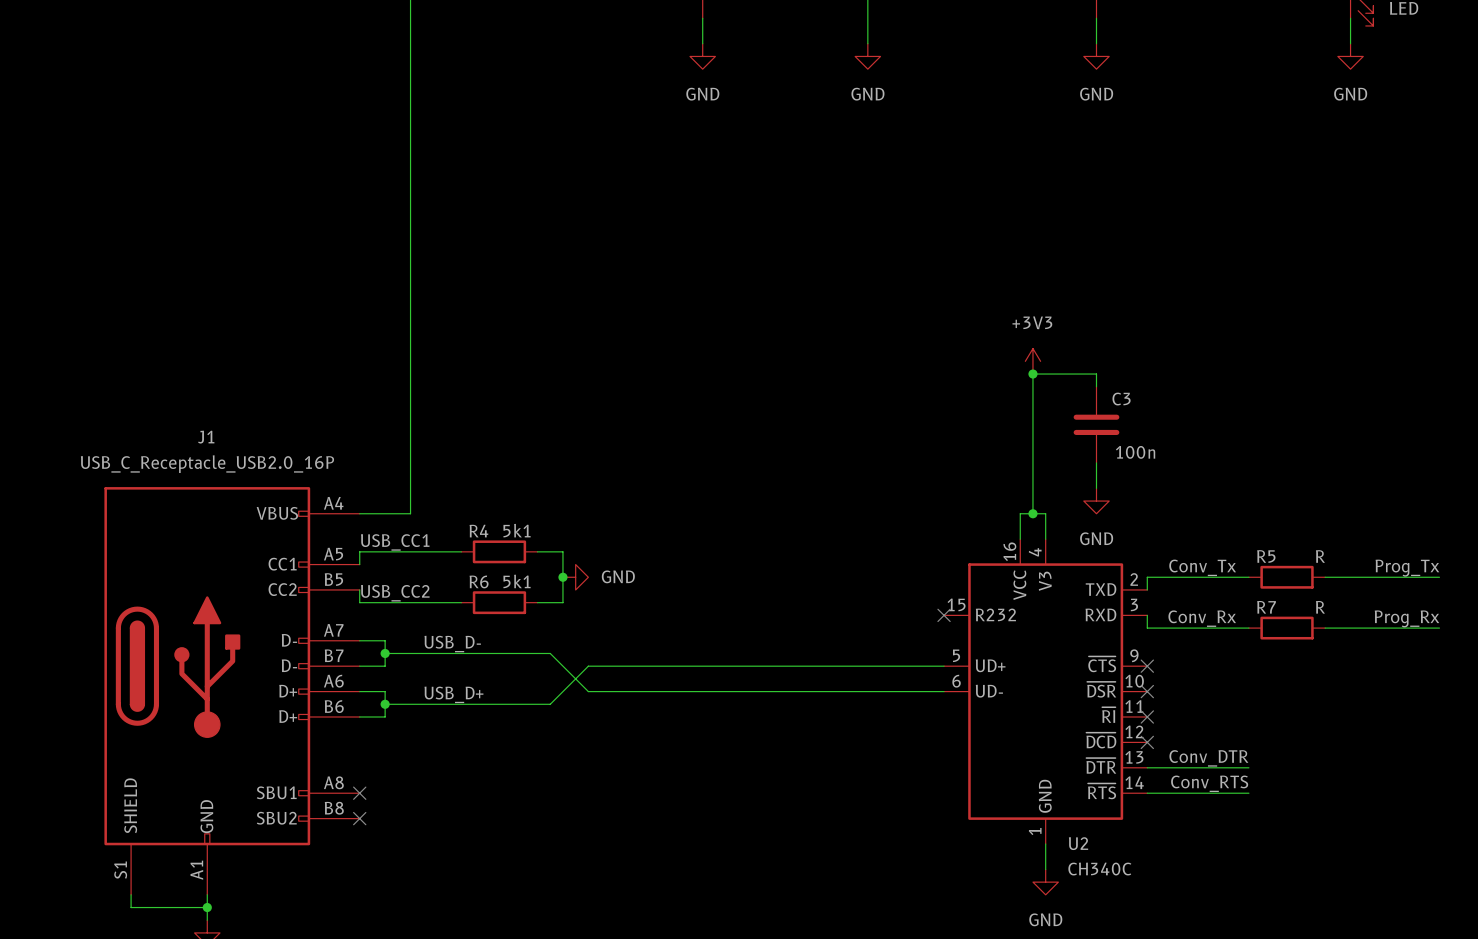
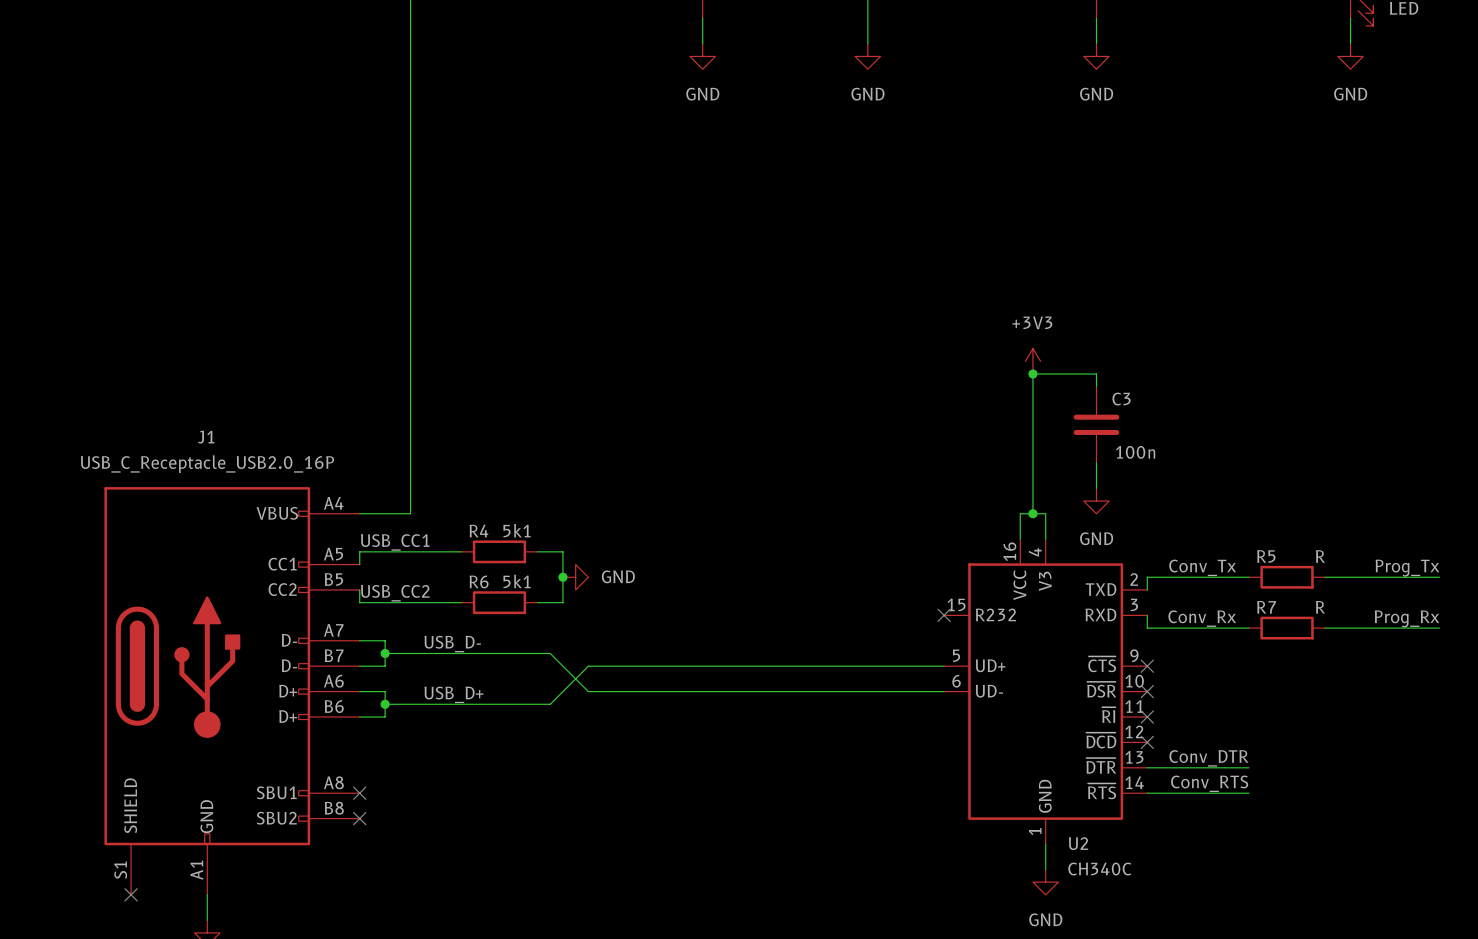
wire: (131, 894) (131, 907) (207, 907) -> none
no-connect mark: none -> (131, 894)
junction: (207, 907) -> none

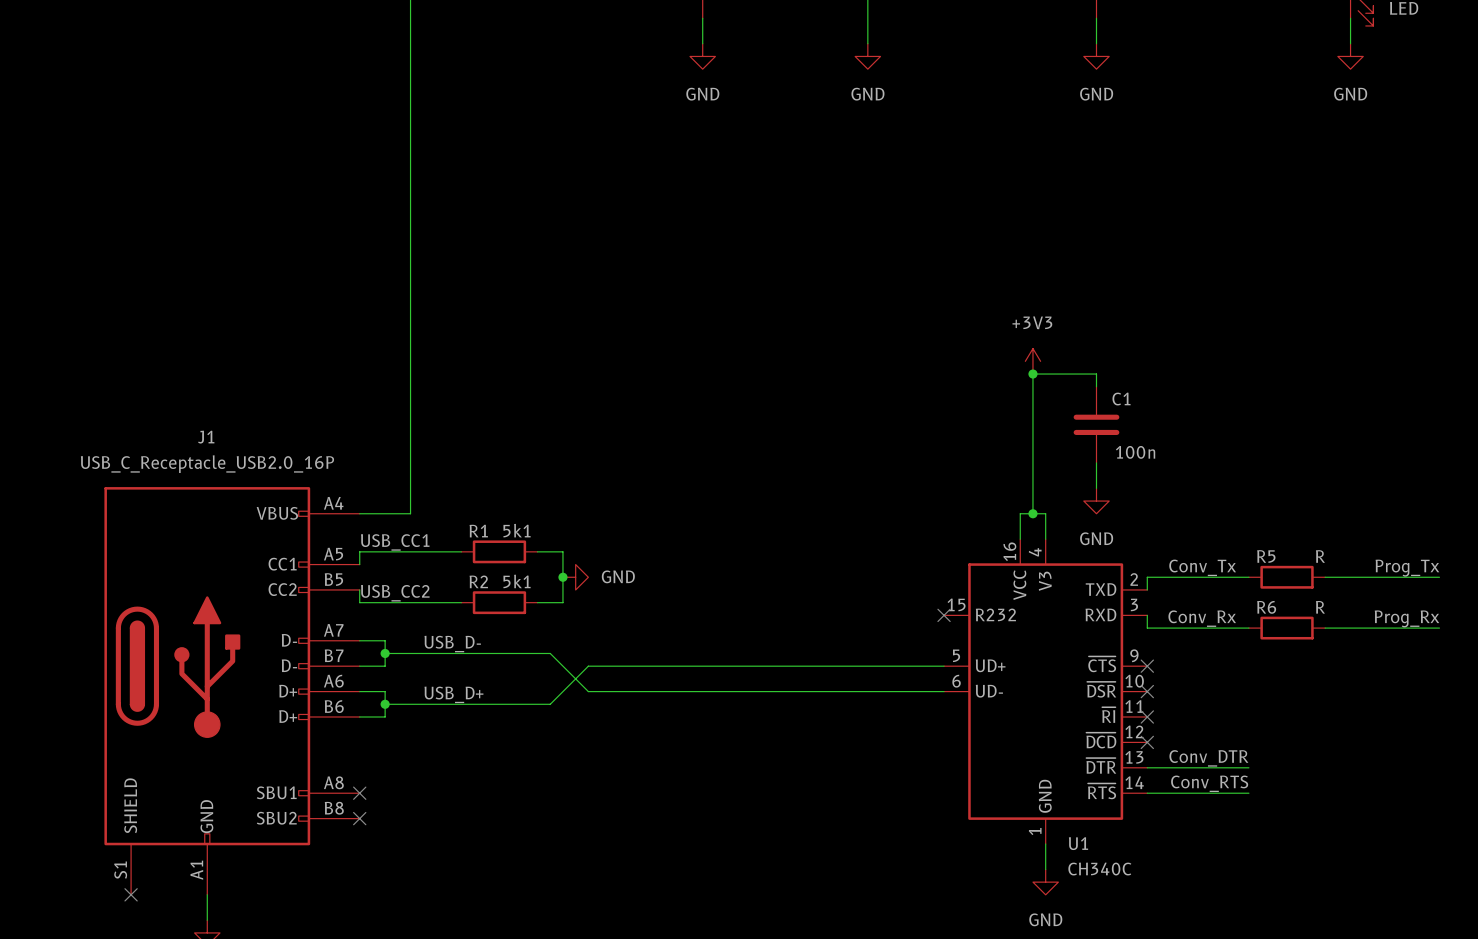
C3 name: C3 (1121, 399) -> C1 (1121, 399)
R4 name: R4 (478, 531) -> R1 (478, 531)
R6 name: R6 (479, 581) -> R2 (478, 581)
R7 name: R7 (1266, 607) -> R6 (1266, 607)
U2 name: U2 (1078, 843) -> U1 (1078, 843)

